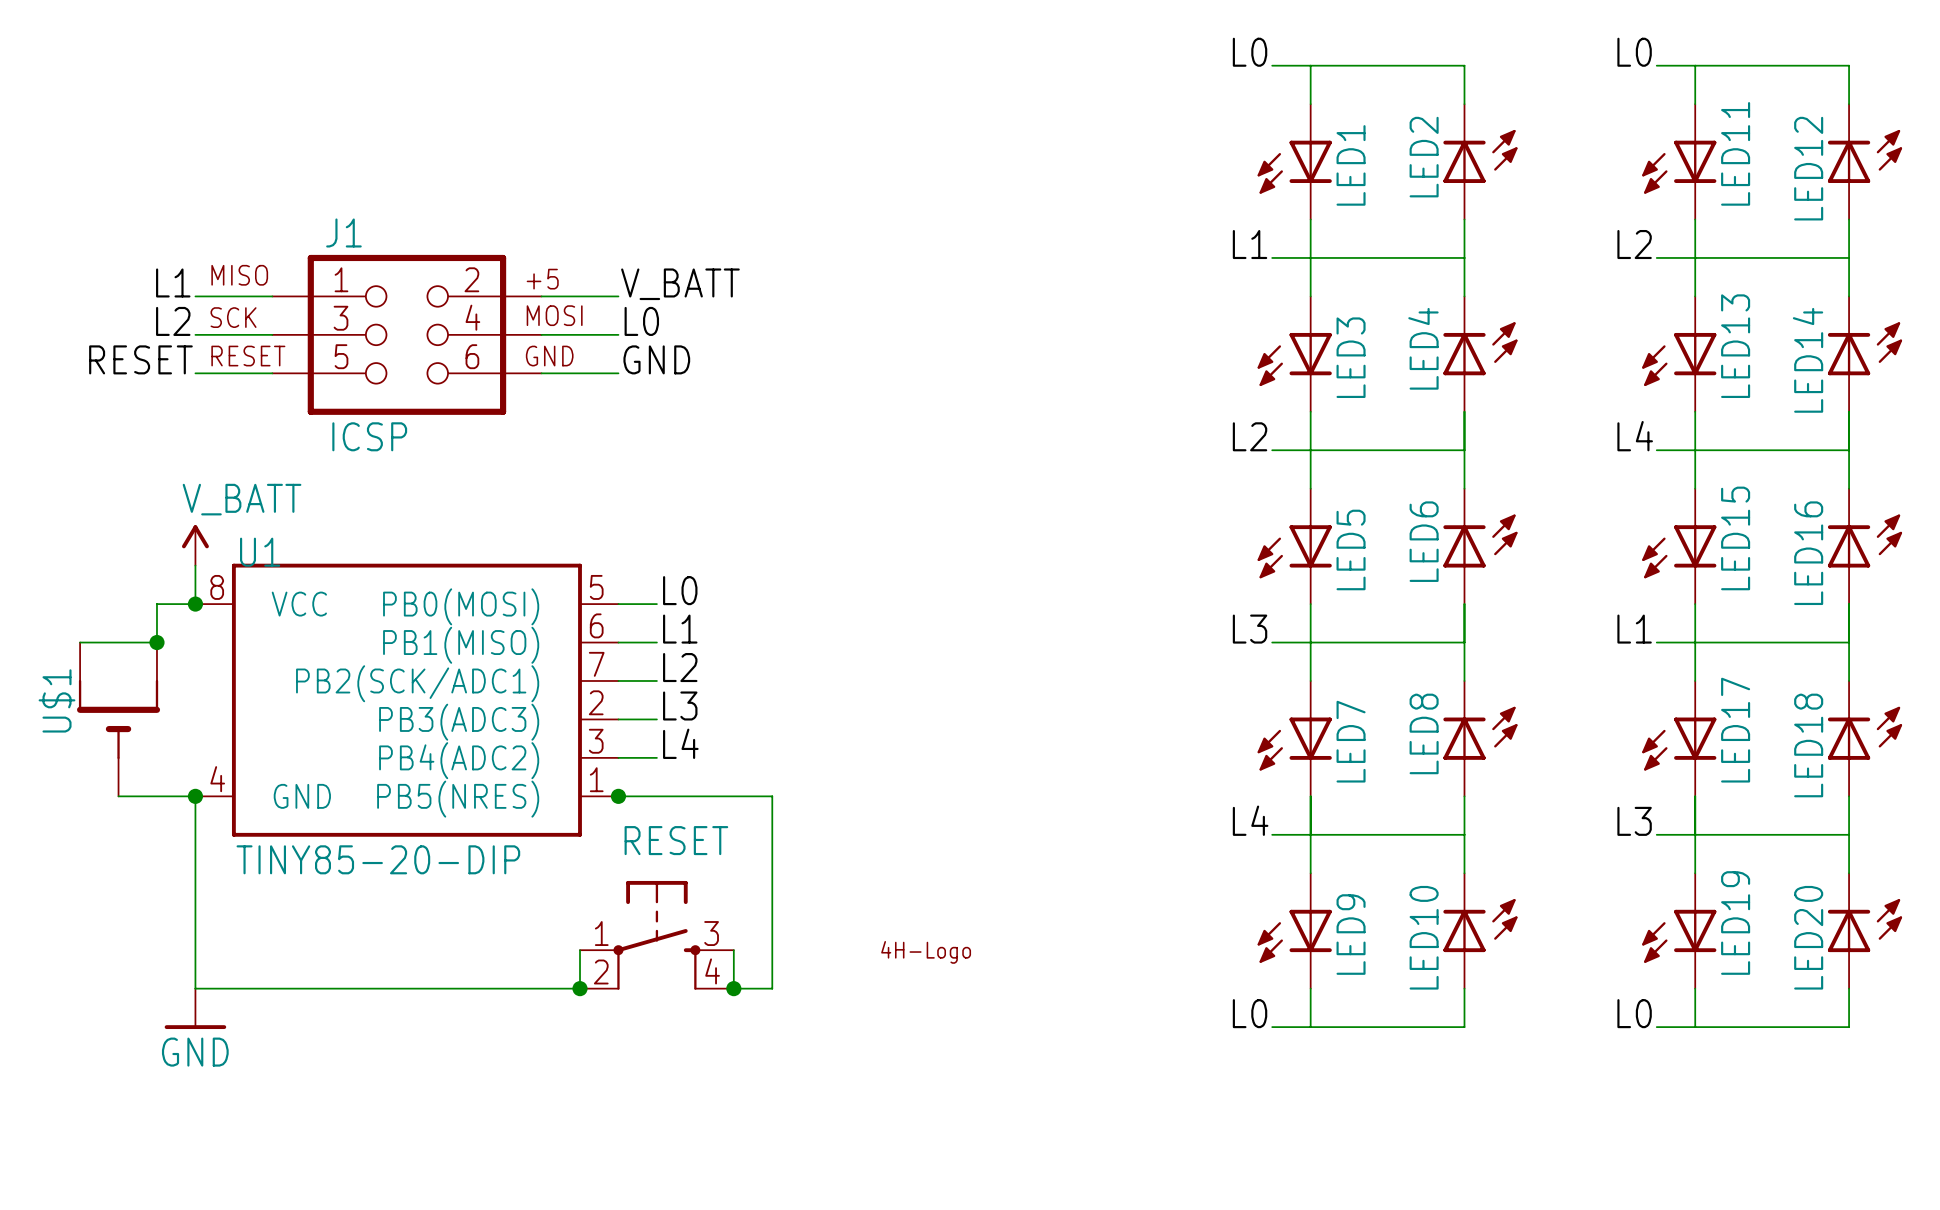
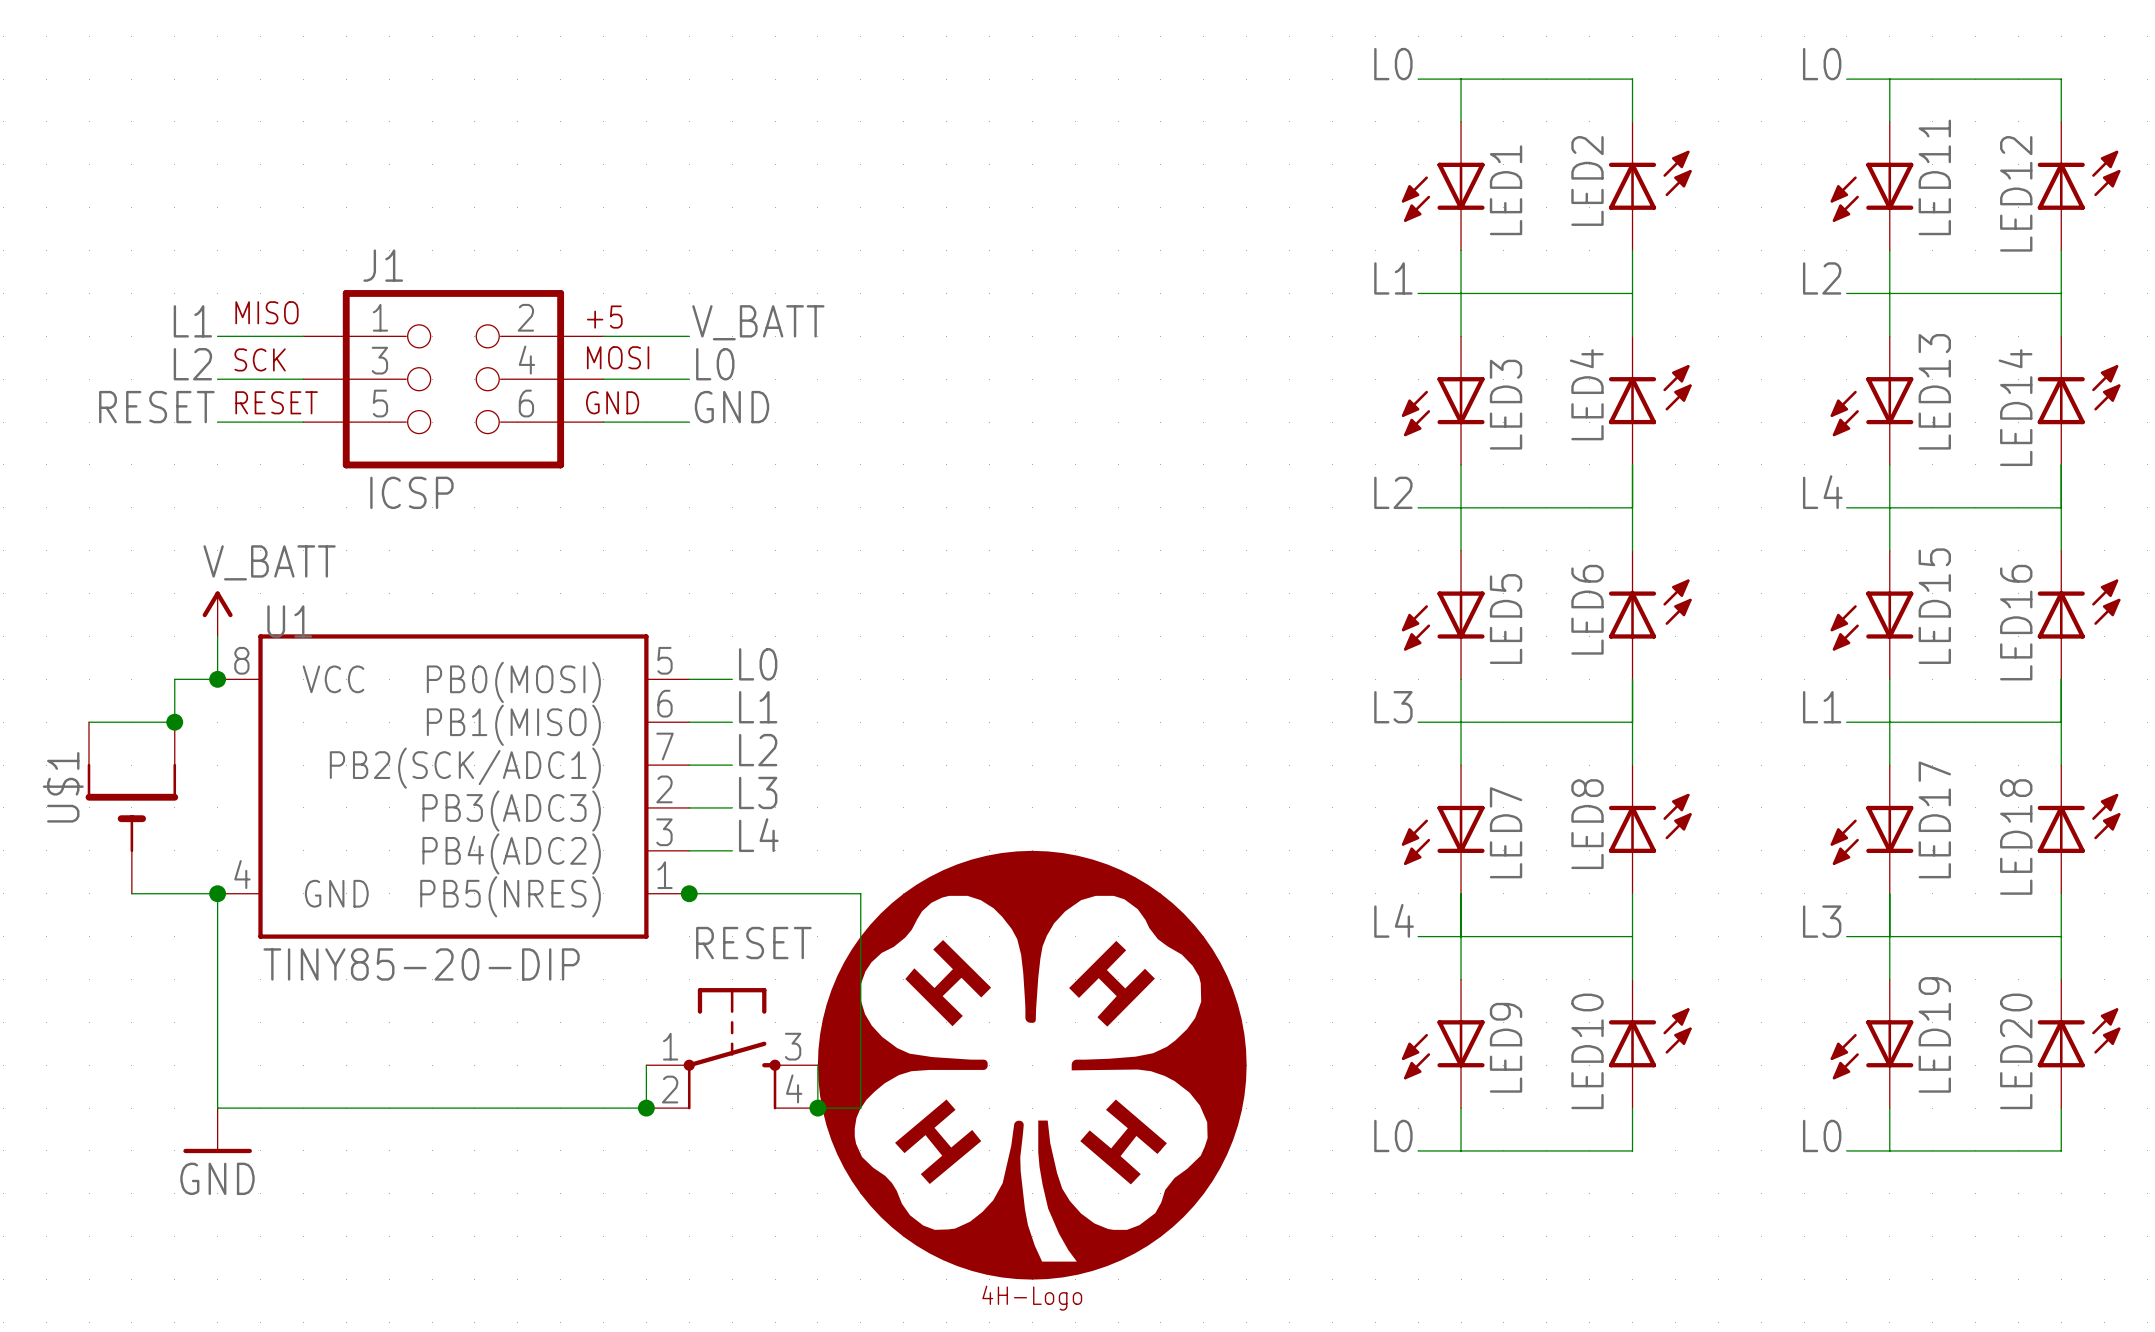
part symbol: [881, 941, 971, 964] -> [817, 850, 1247, 1280]

